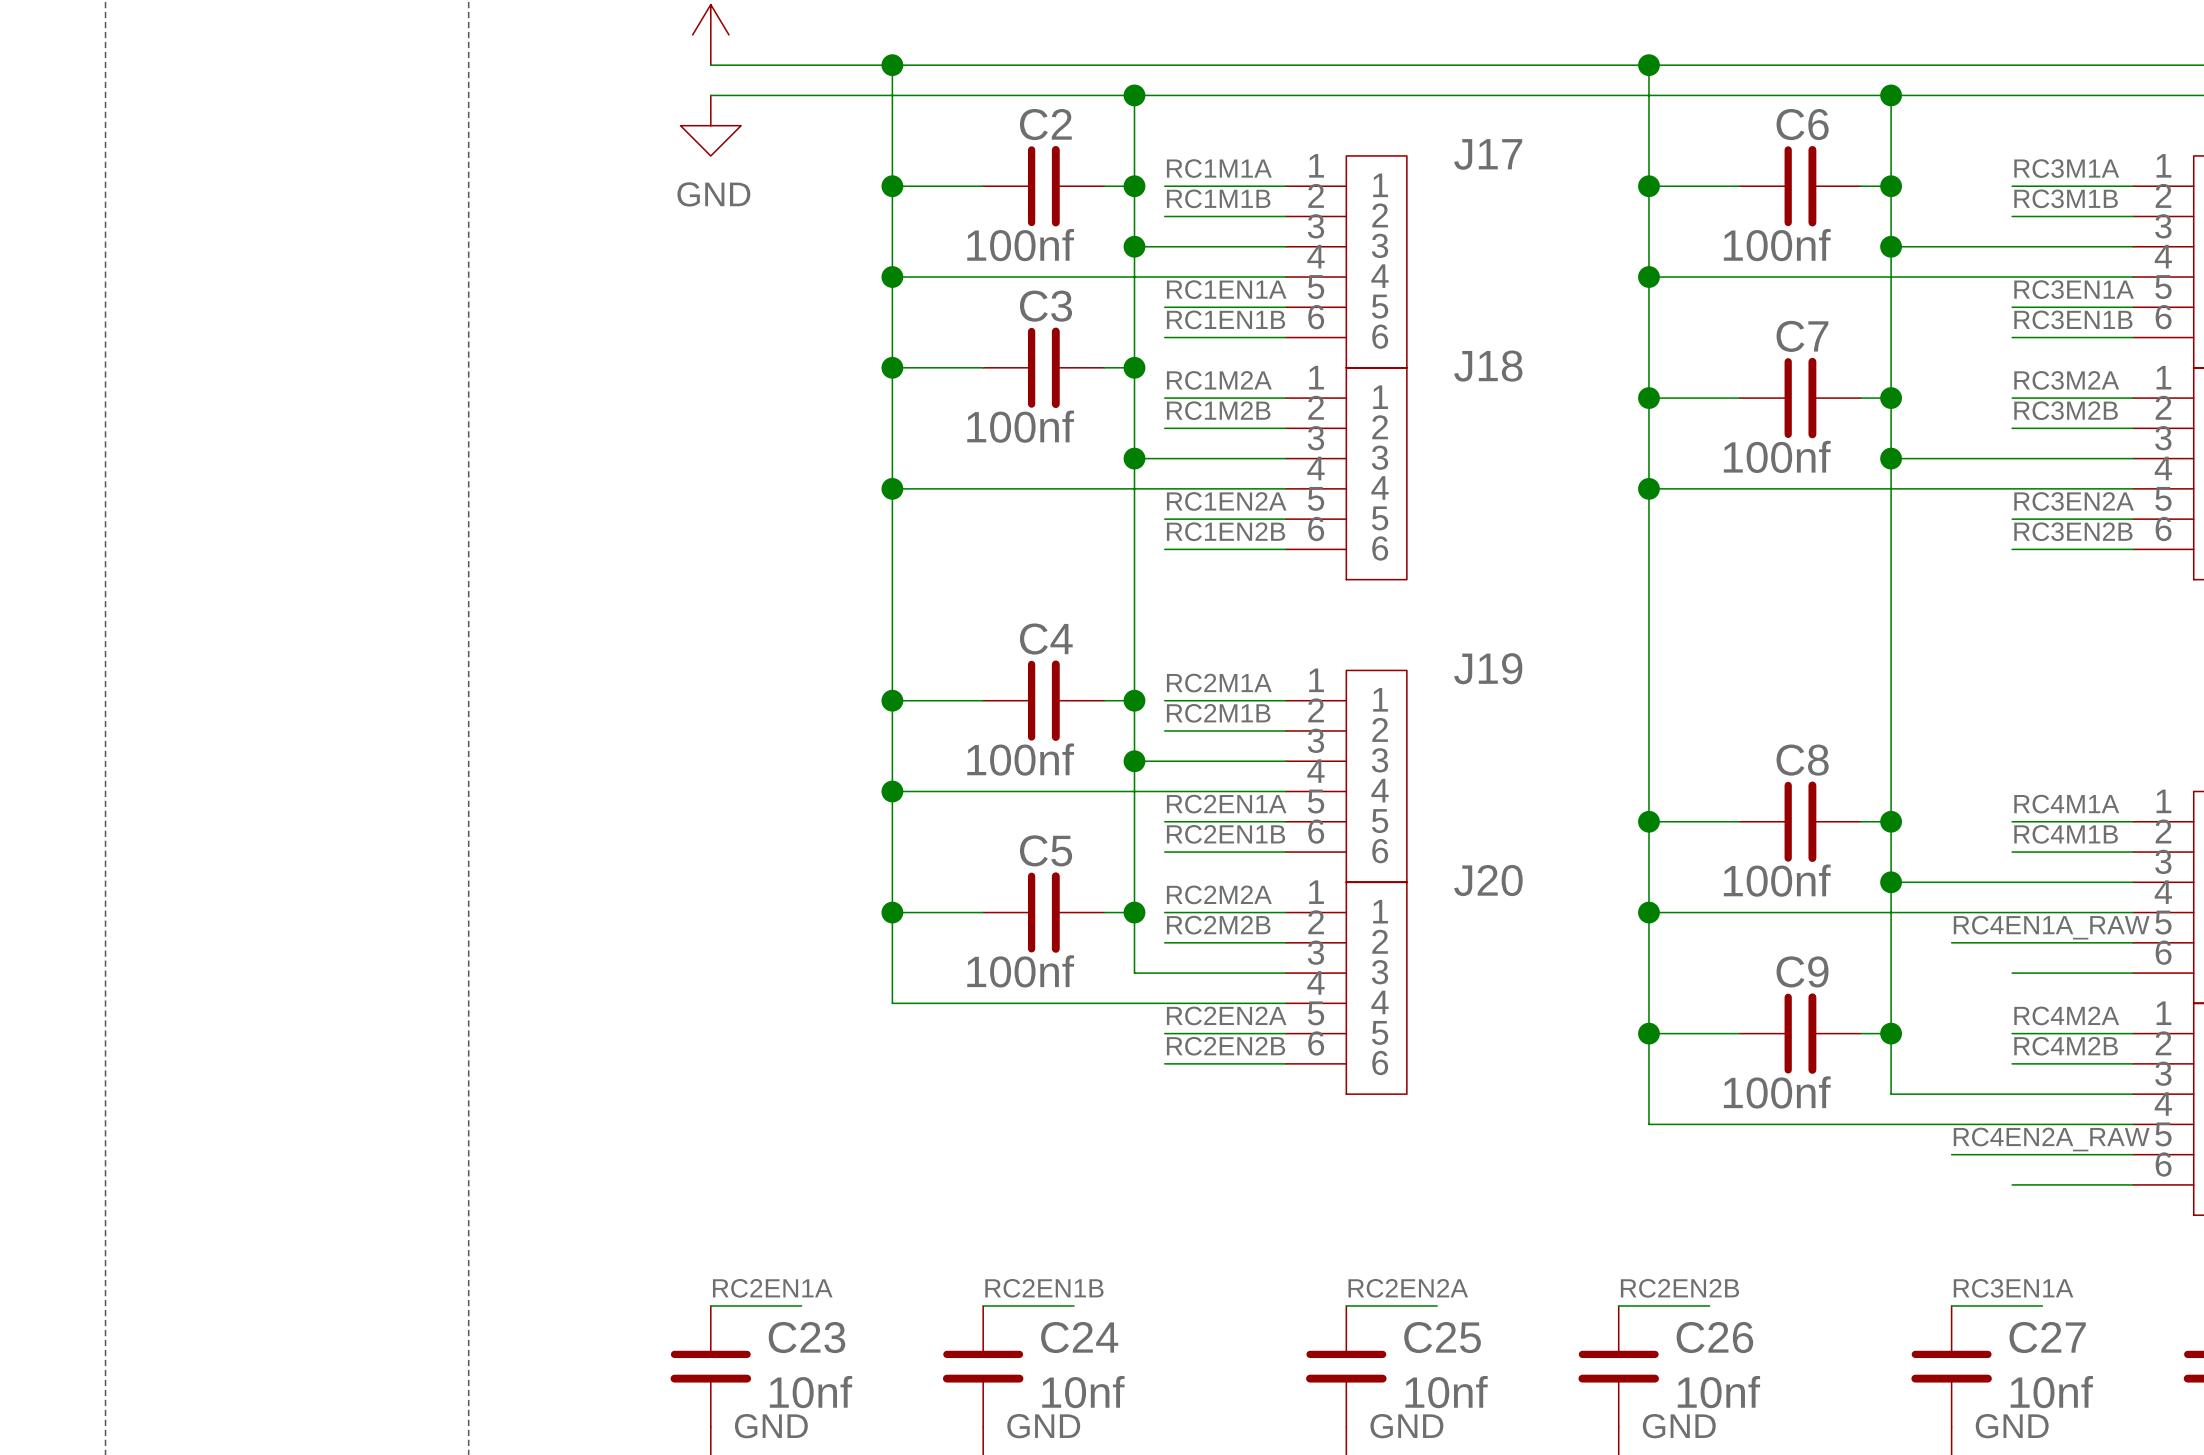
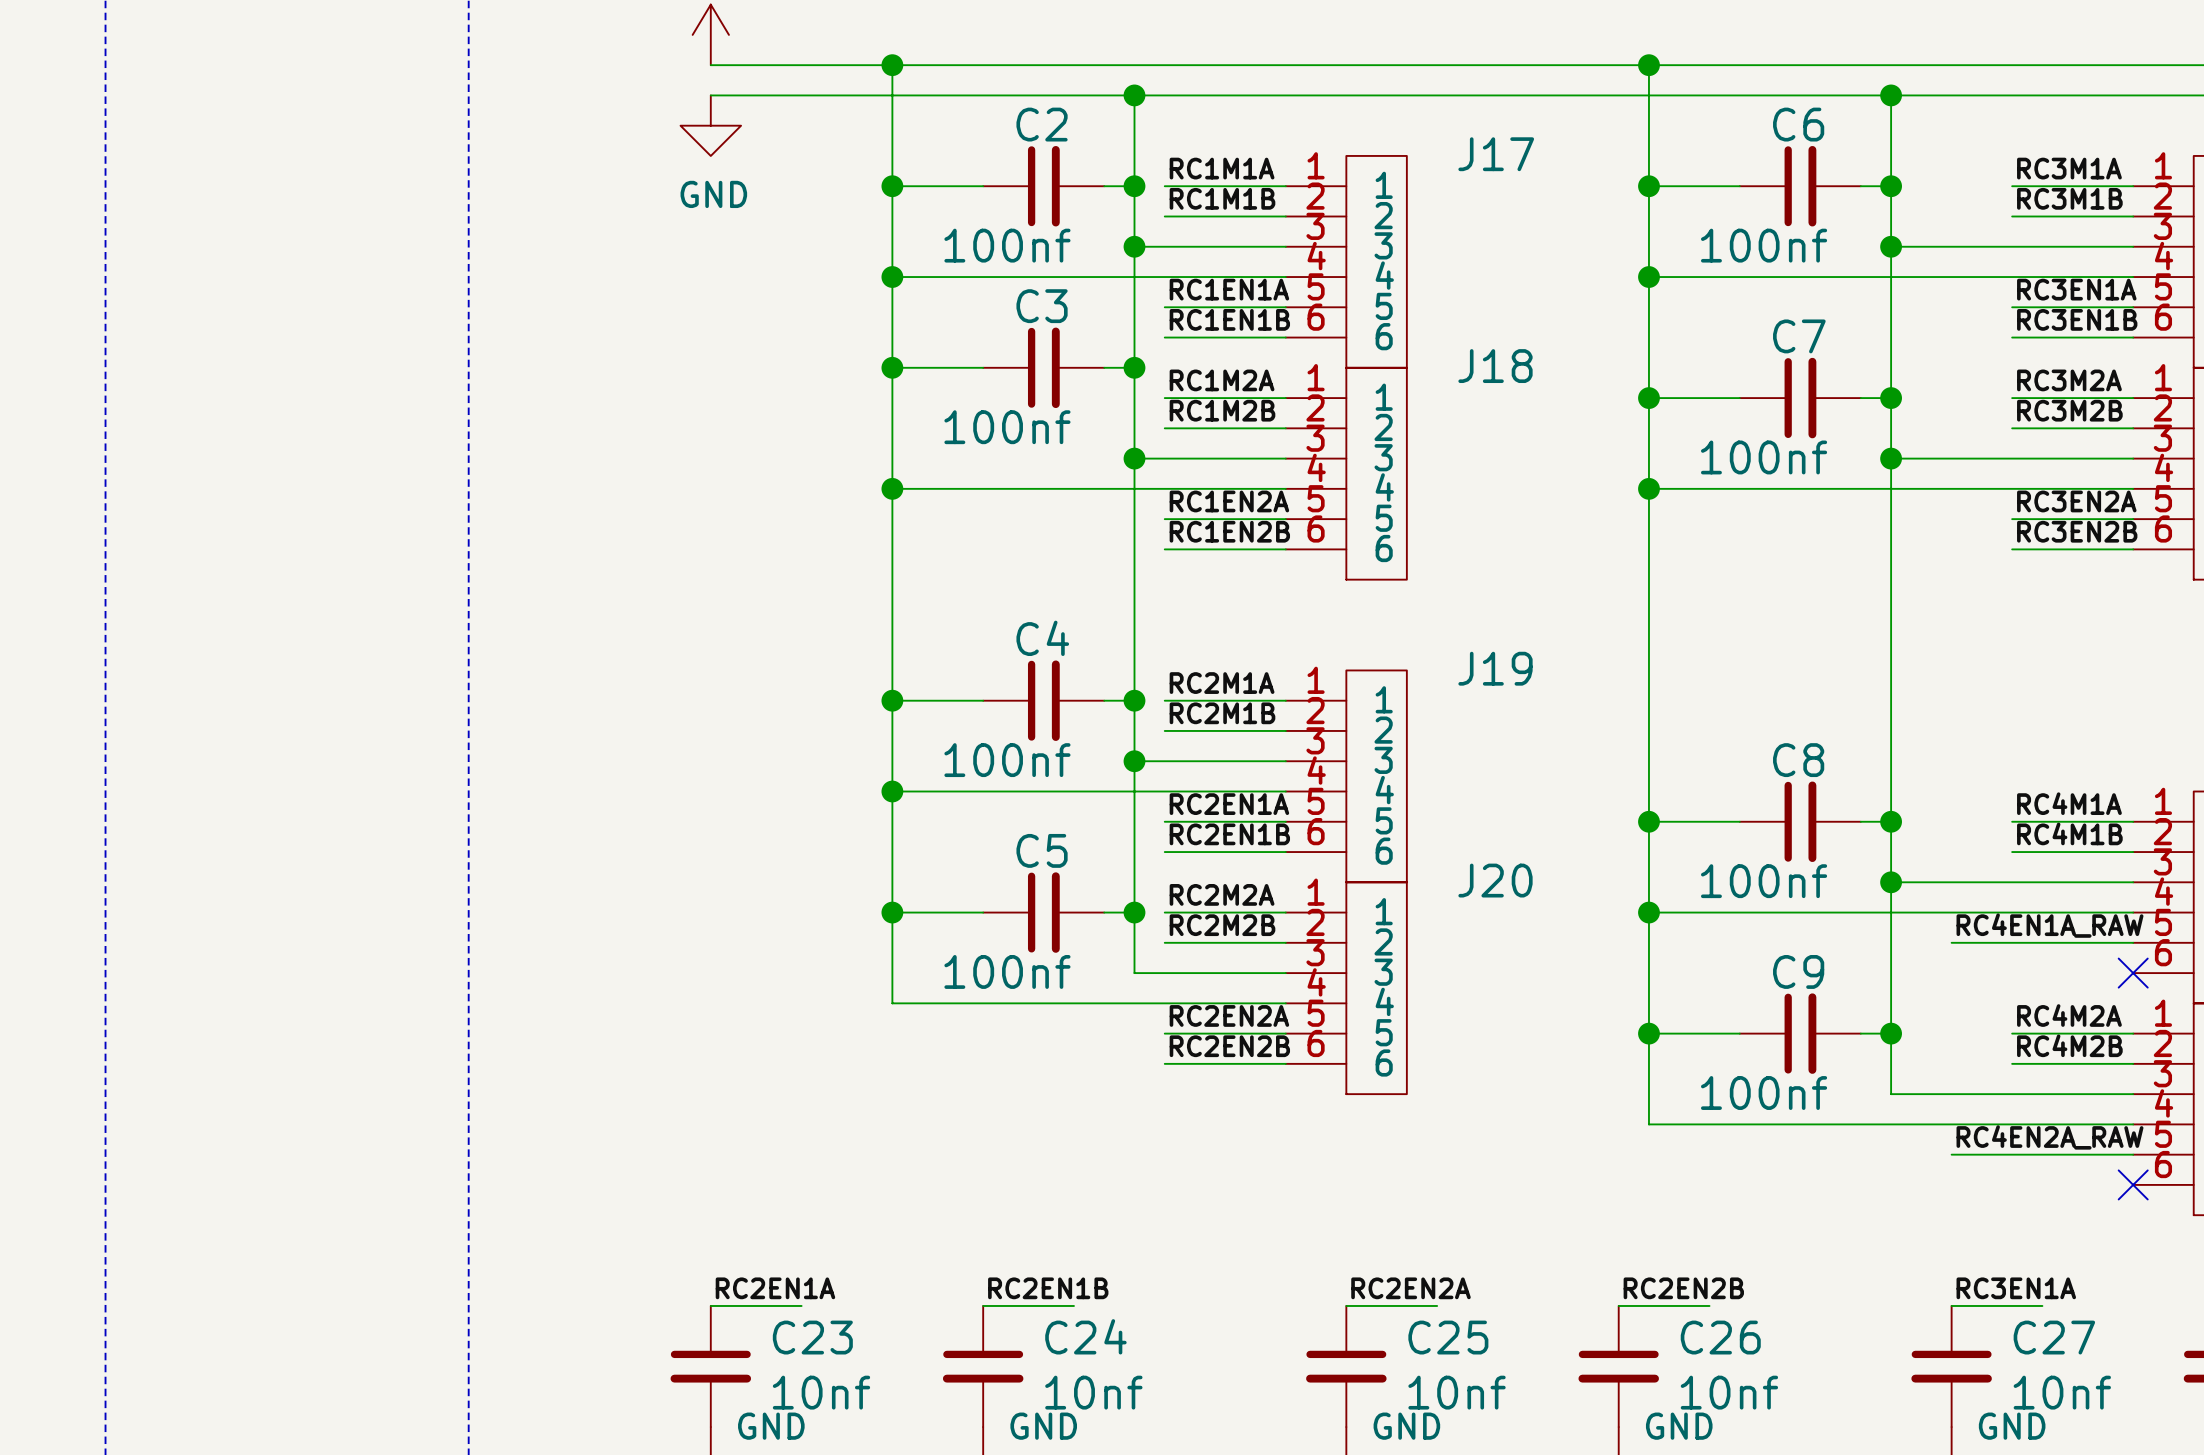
wire: (2012, 973) (2133, 973) -> none
no-connect mark: none -> (2133, 973)
wire: (2012, 1184) (2133, 1184) -> none
no-connect mark: none -> (2133, 1184)

